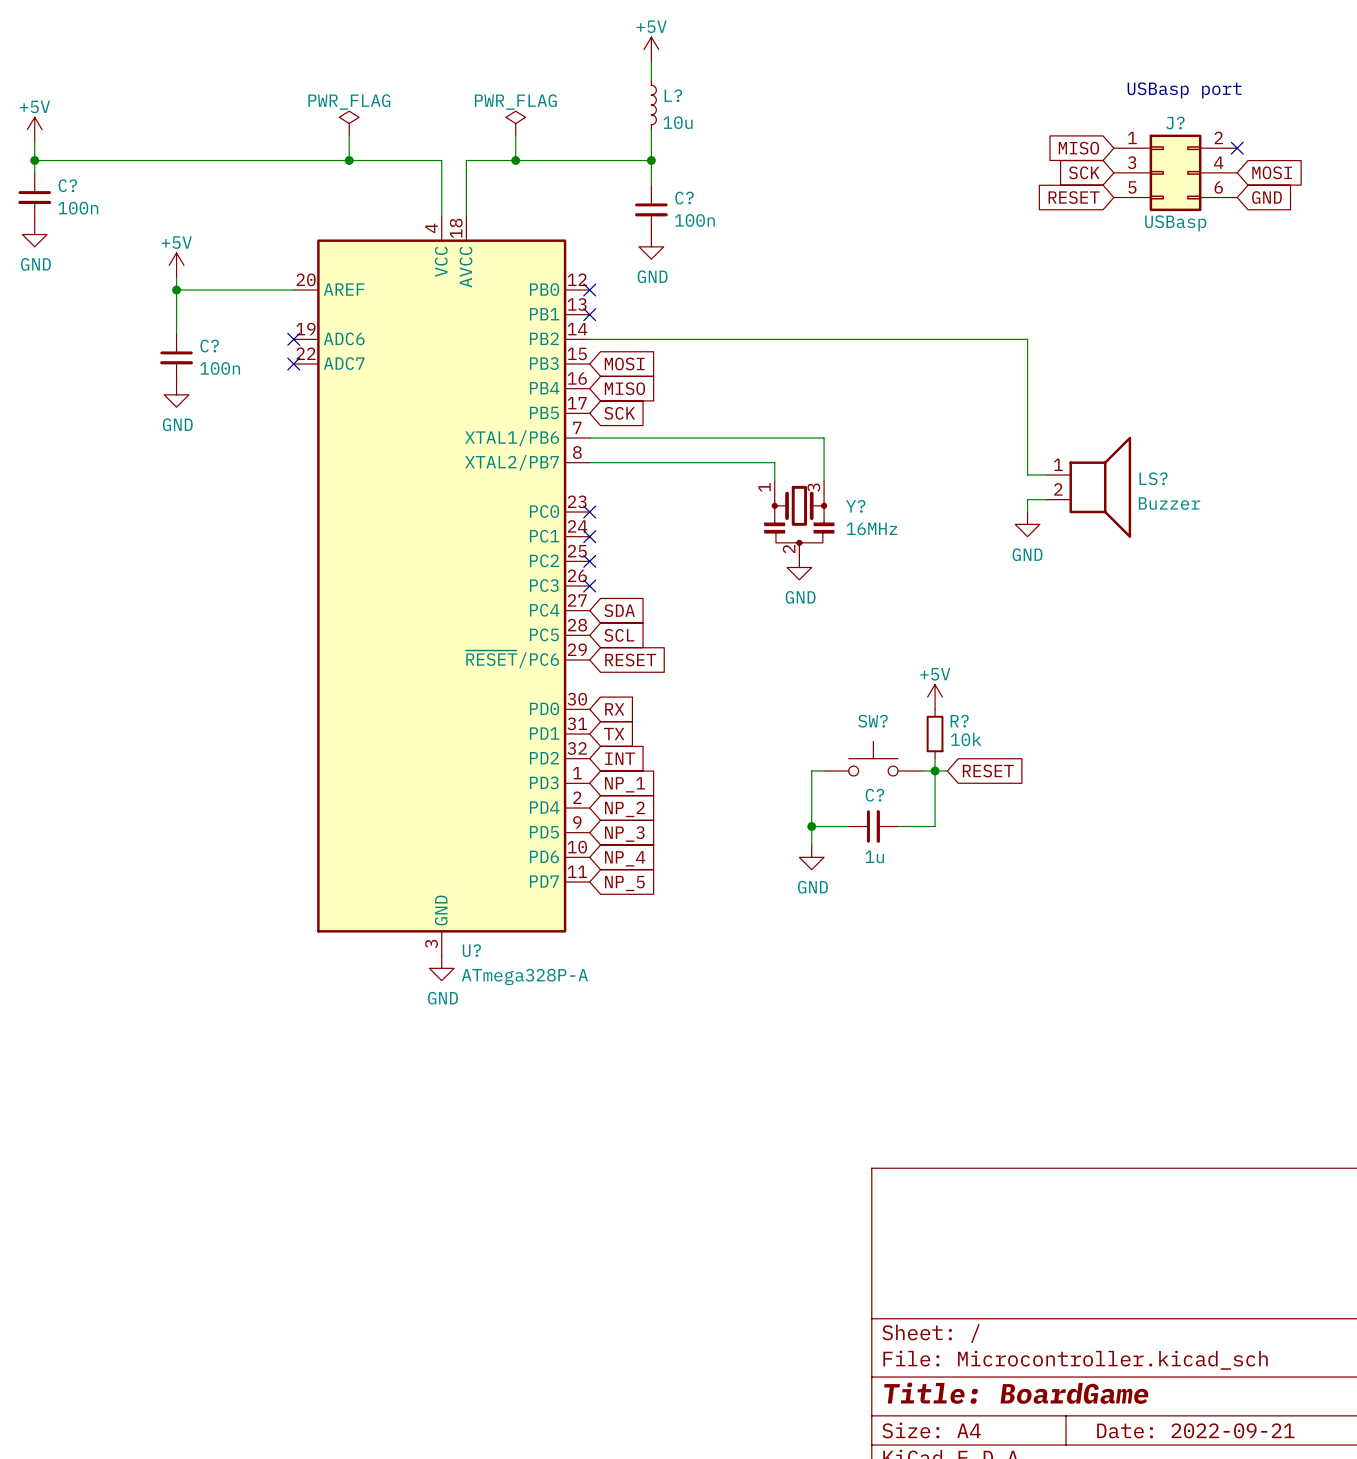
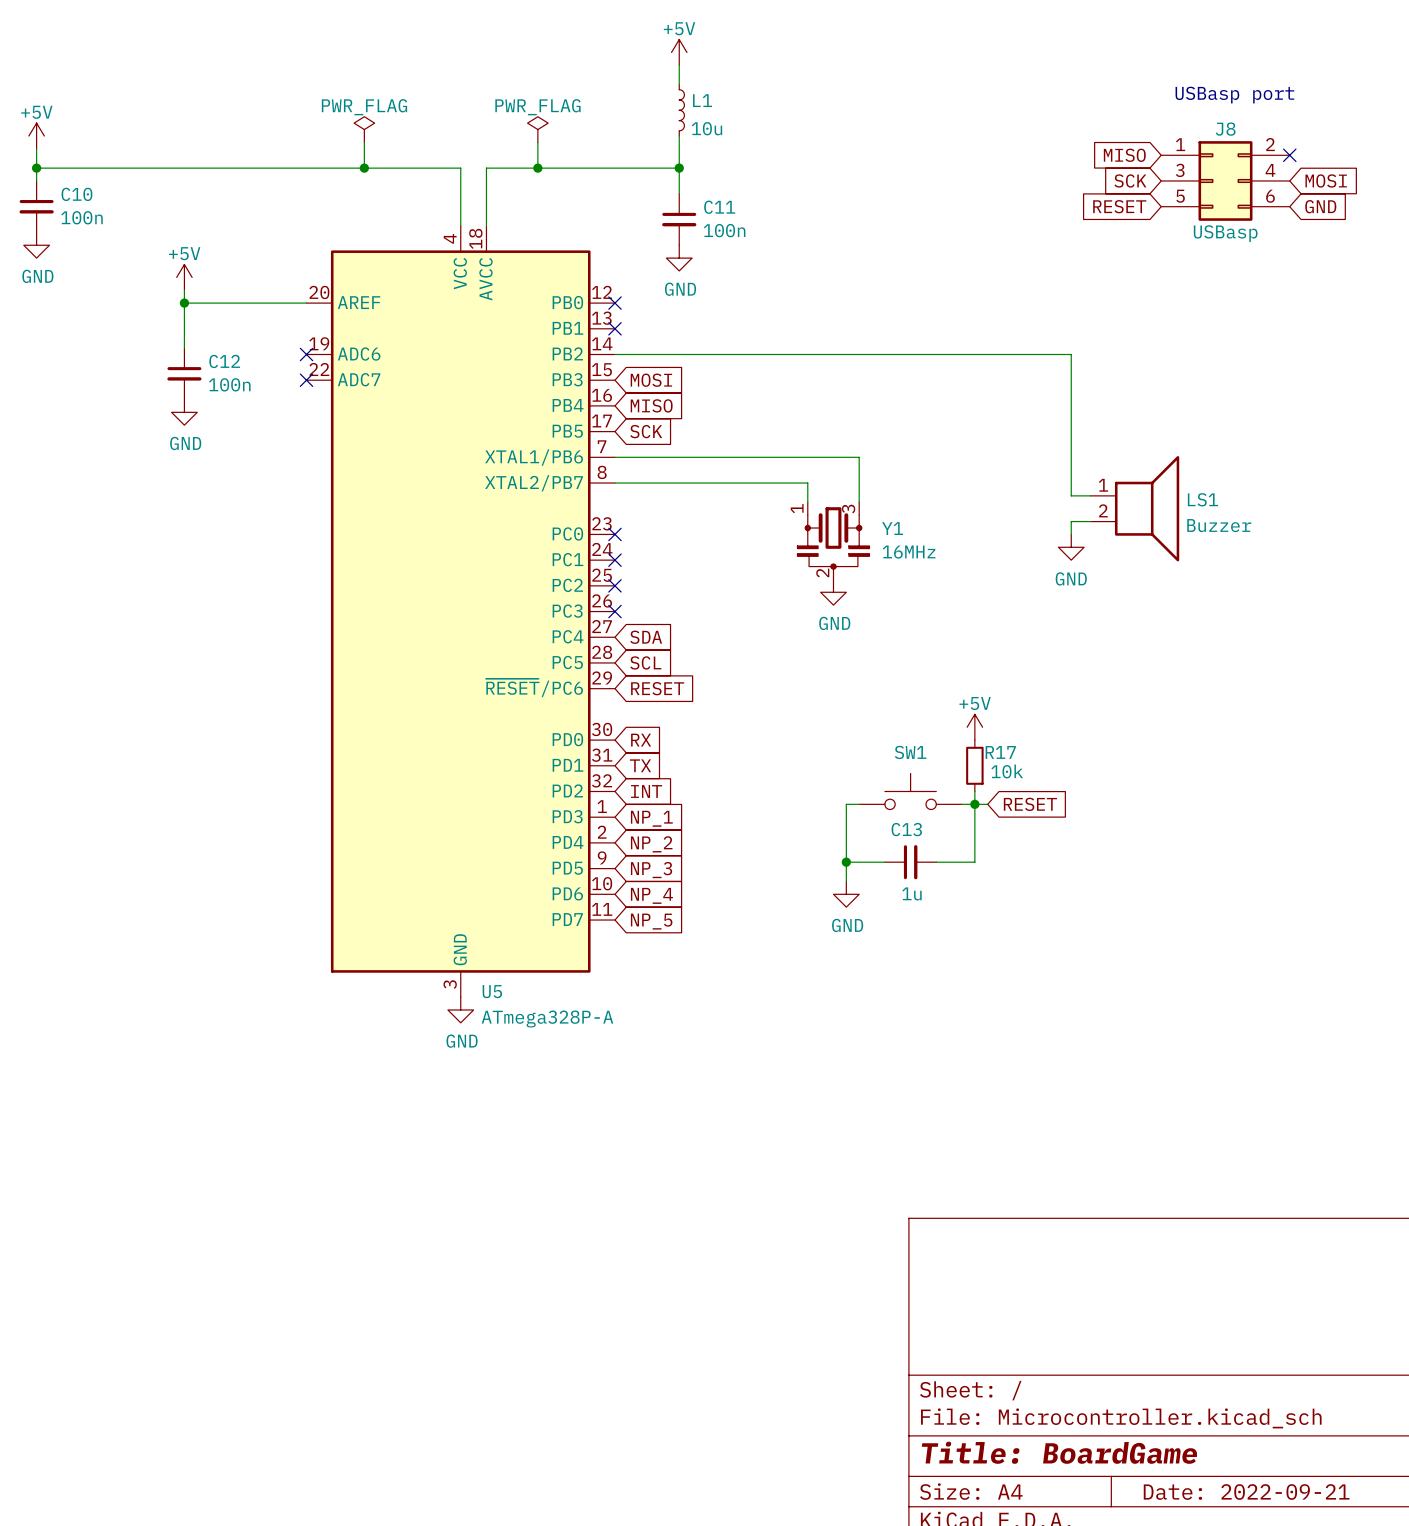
L? name: L? (673, 95) -> L1 (702, 100)
J? name: J? (1175, 123) -> J8 (1225, 129)
C? name: C? (67, 185) -> C10 (76, 194)
C? name: C? (684, 198) -> C11 (719, 207)
C? name: C? (209, 346) -> C12 (224, 361)
LS? name: LS? (1153, 478) -> LS1 (1202, 499)
Y? name: Y? (855, 506) -> Y1 (892, 528)
SW? name: SW? (872, 721) -> SW1 (910, 752)
R? name: R? (959, 721) -> R17 (1000, 752)
C? name: C? (874, 795) -> C13 (906, 829)
U? name: U? (471, 950) -> U5 (492, 991)

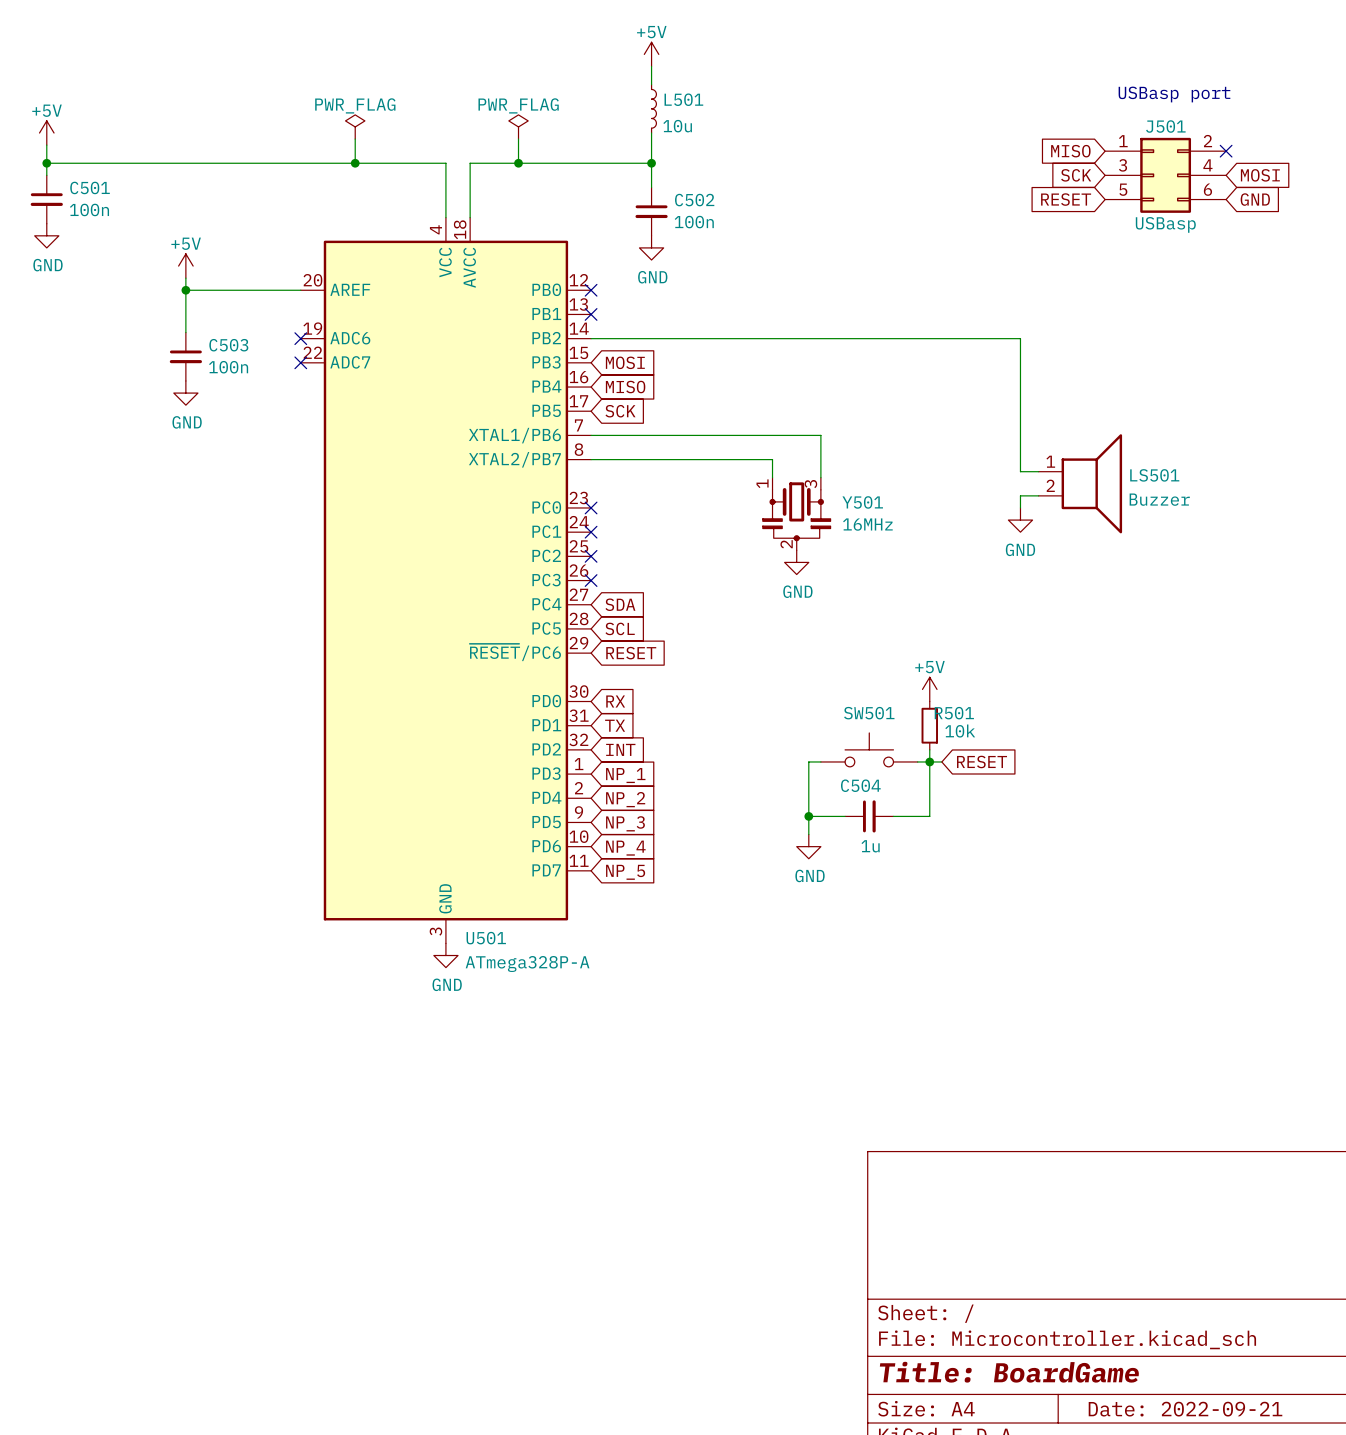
L1 name: L1 (702, 100) -> L501 (683, 99)
J8 name: J8 (1225, 129) -> J501 (1165, 126)
C10 name: C10 (76, 194) -> C501 (90, 187)
C11 name: C11 (719, 207) -> C502 (694, 200)
C12 name: C12 (224, 361) -> C503 (228, 345)
LS1 name: LS1 (1202, 499) -> LS501 (1154, 475)
Y1 name: Y1 (892, 528) -> Y501 (862, 502)
SW1 name: SW1 (910, 752) -> SW501 (869, 713)
R17 name: R17 (1000, 752) -> R501 (954, 713)
C13 name: C13 (906, 829) -> C504 (860, 785)
U5 name: U5 (492, 991) -> U501 (486, 938)

